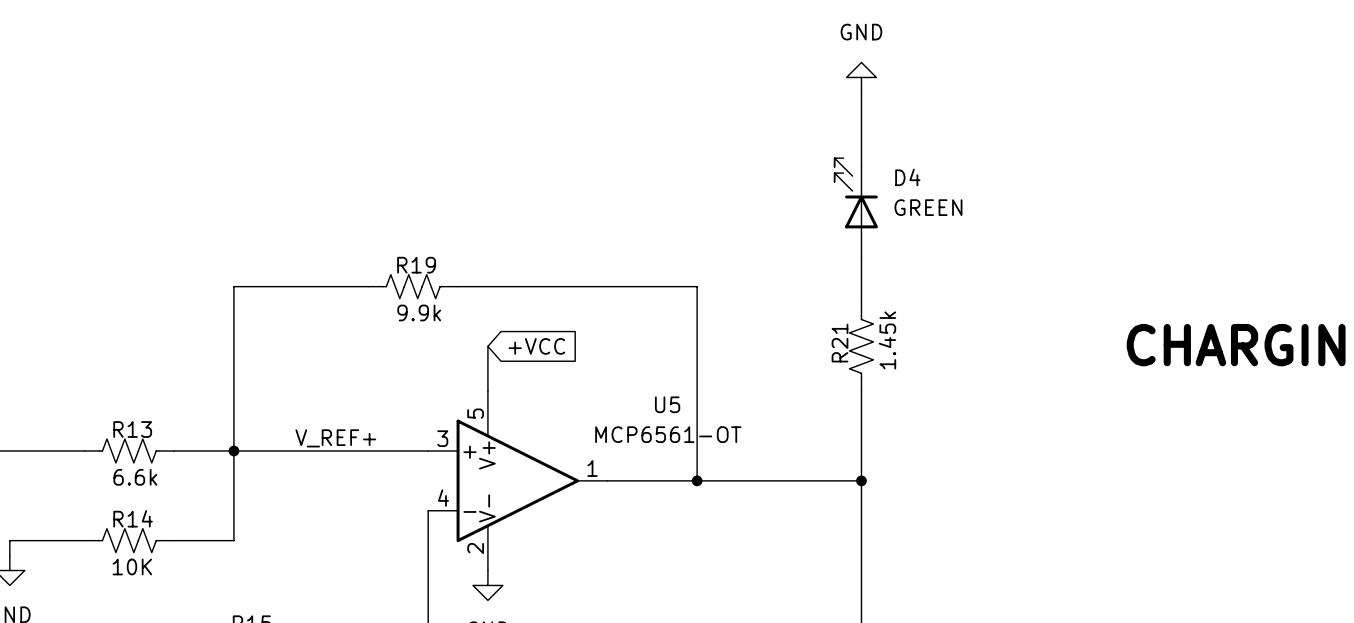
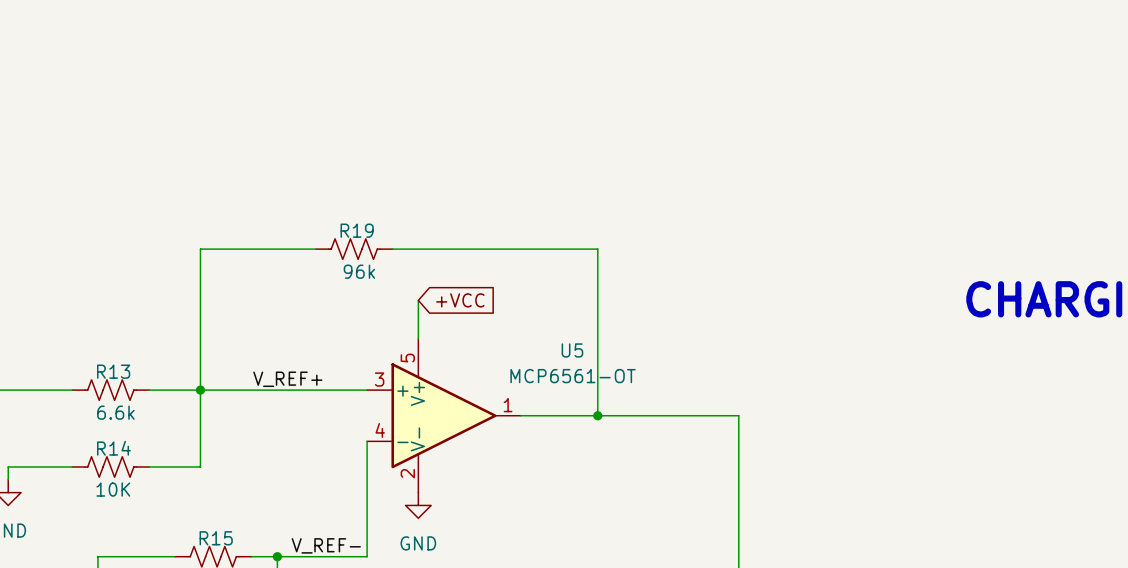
power symbol: GND (861, 77) -> none
wire: (861, 92) (861, 167) -> none
D4: GREEN (856, 207) -> none
wire: (861, 256) (861, 301) -> none
R19 value: 9.9k (419, 312) -> 96k (359, 271)
R21: 1.45k (861, 346) -> none
wire: (861, 391) (861, 480) -> none
junction: (861, 480) -> none

